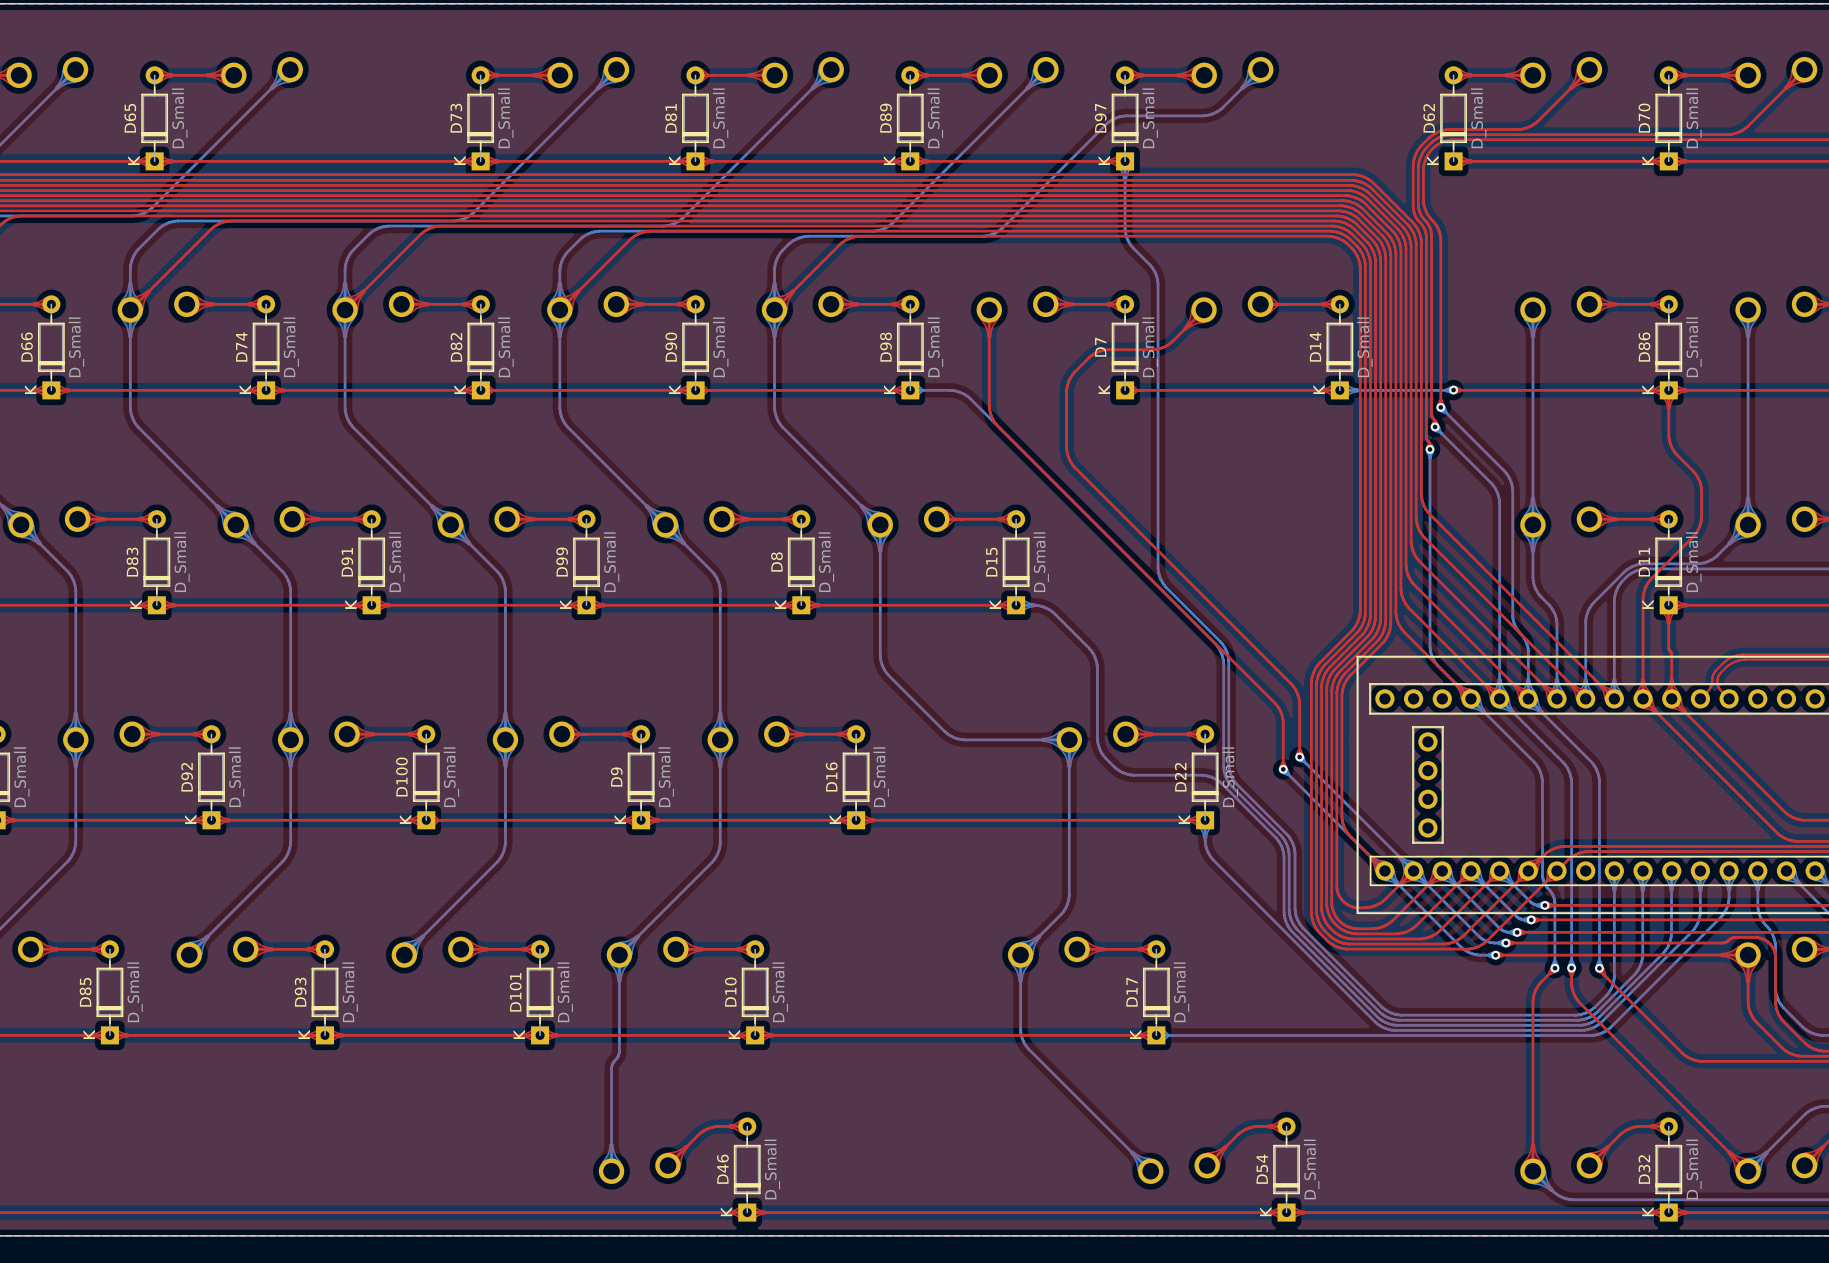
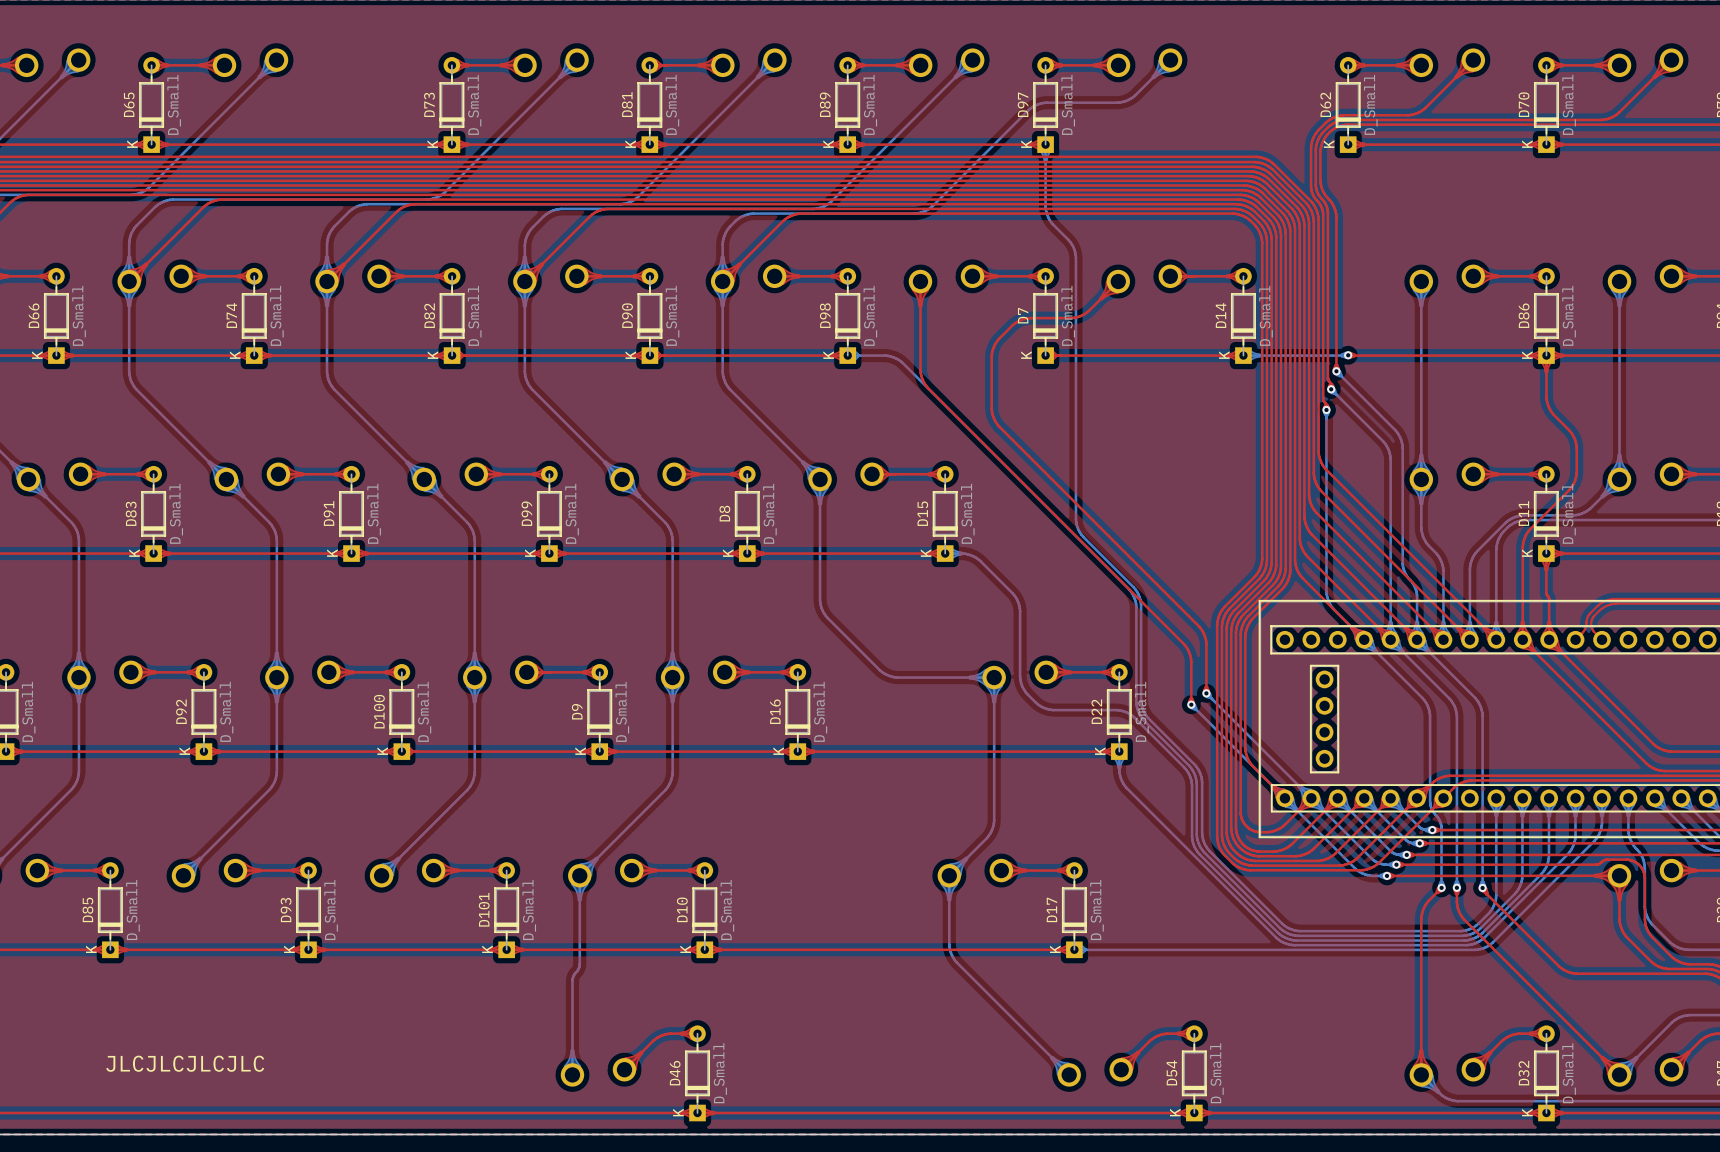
text: none -> JLCJLCJLCJLC (185, 1063)

